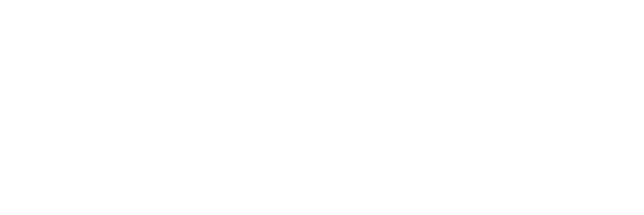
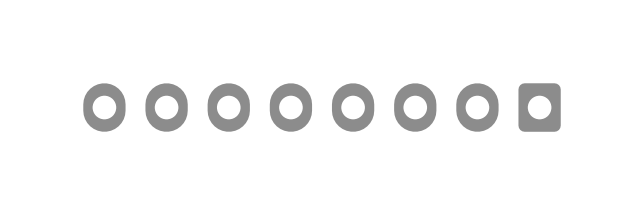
part: none -> (322, 107)

